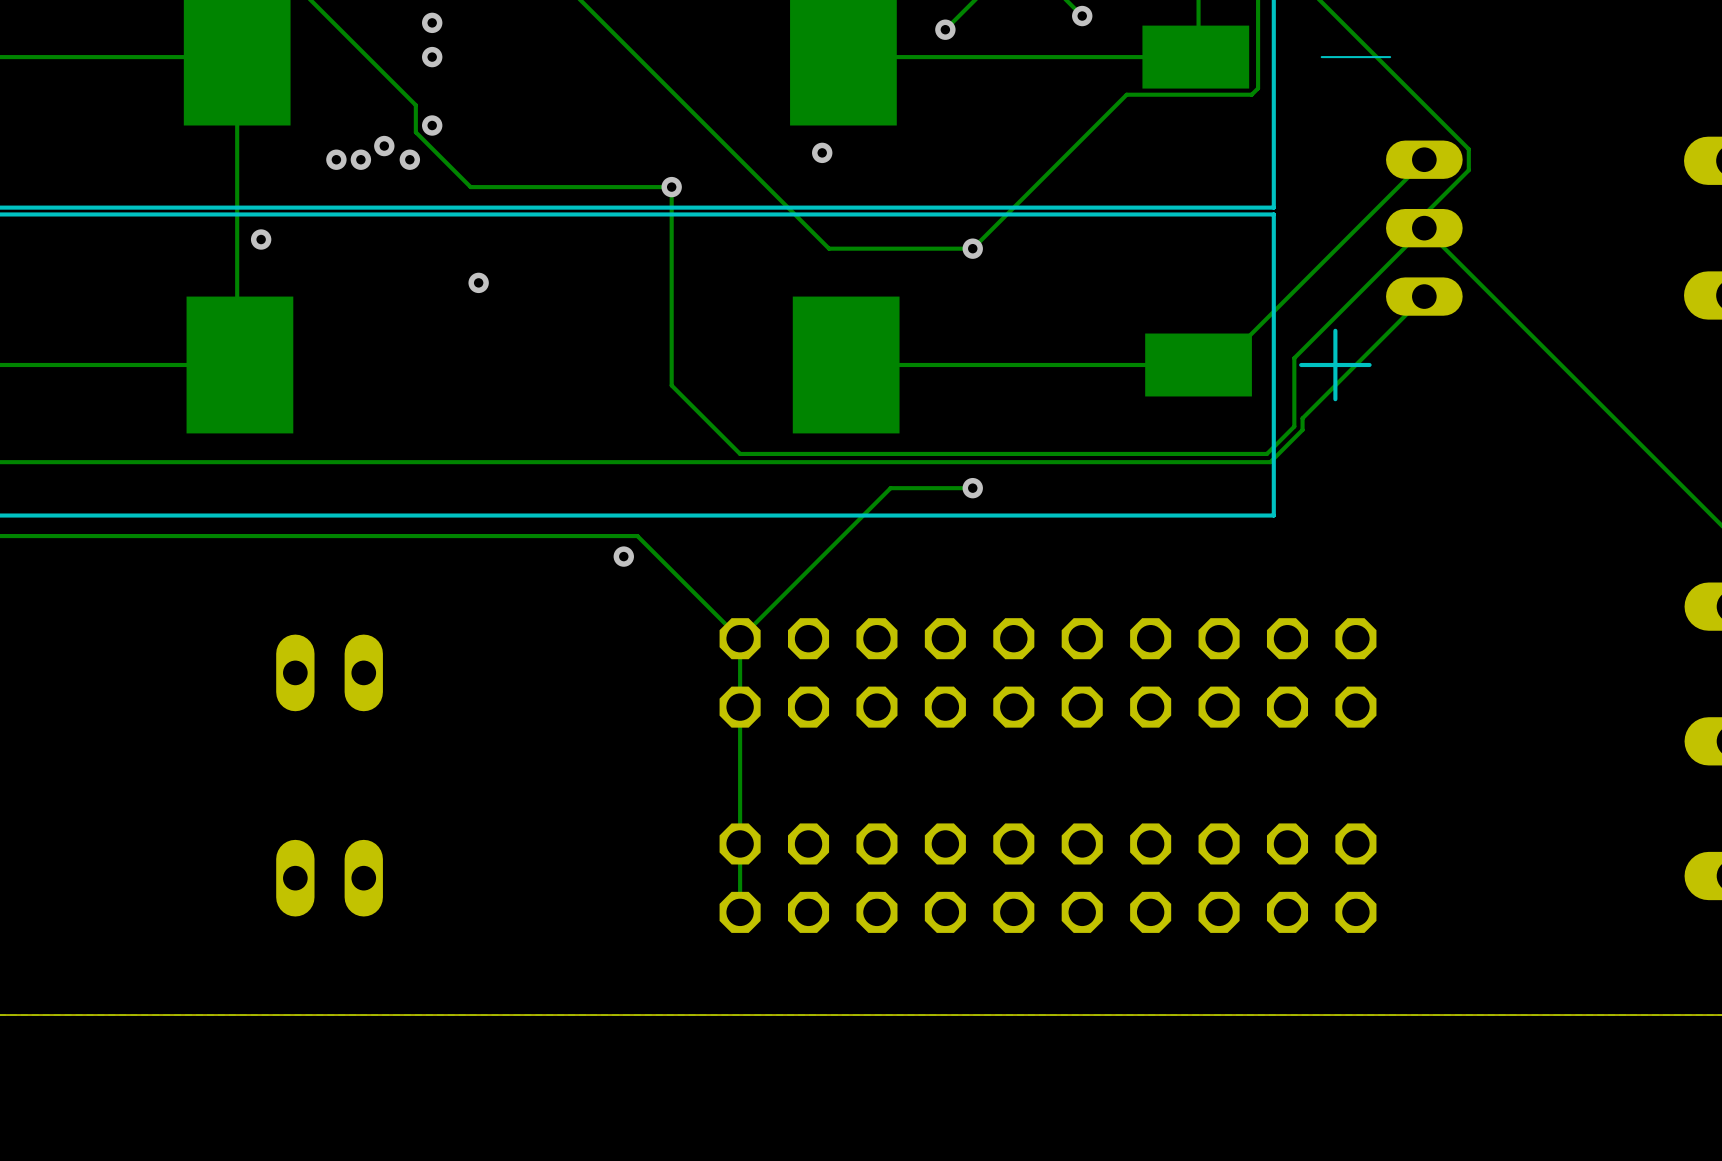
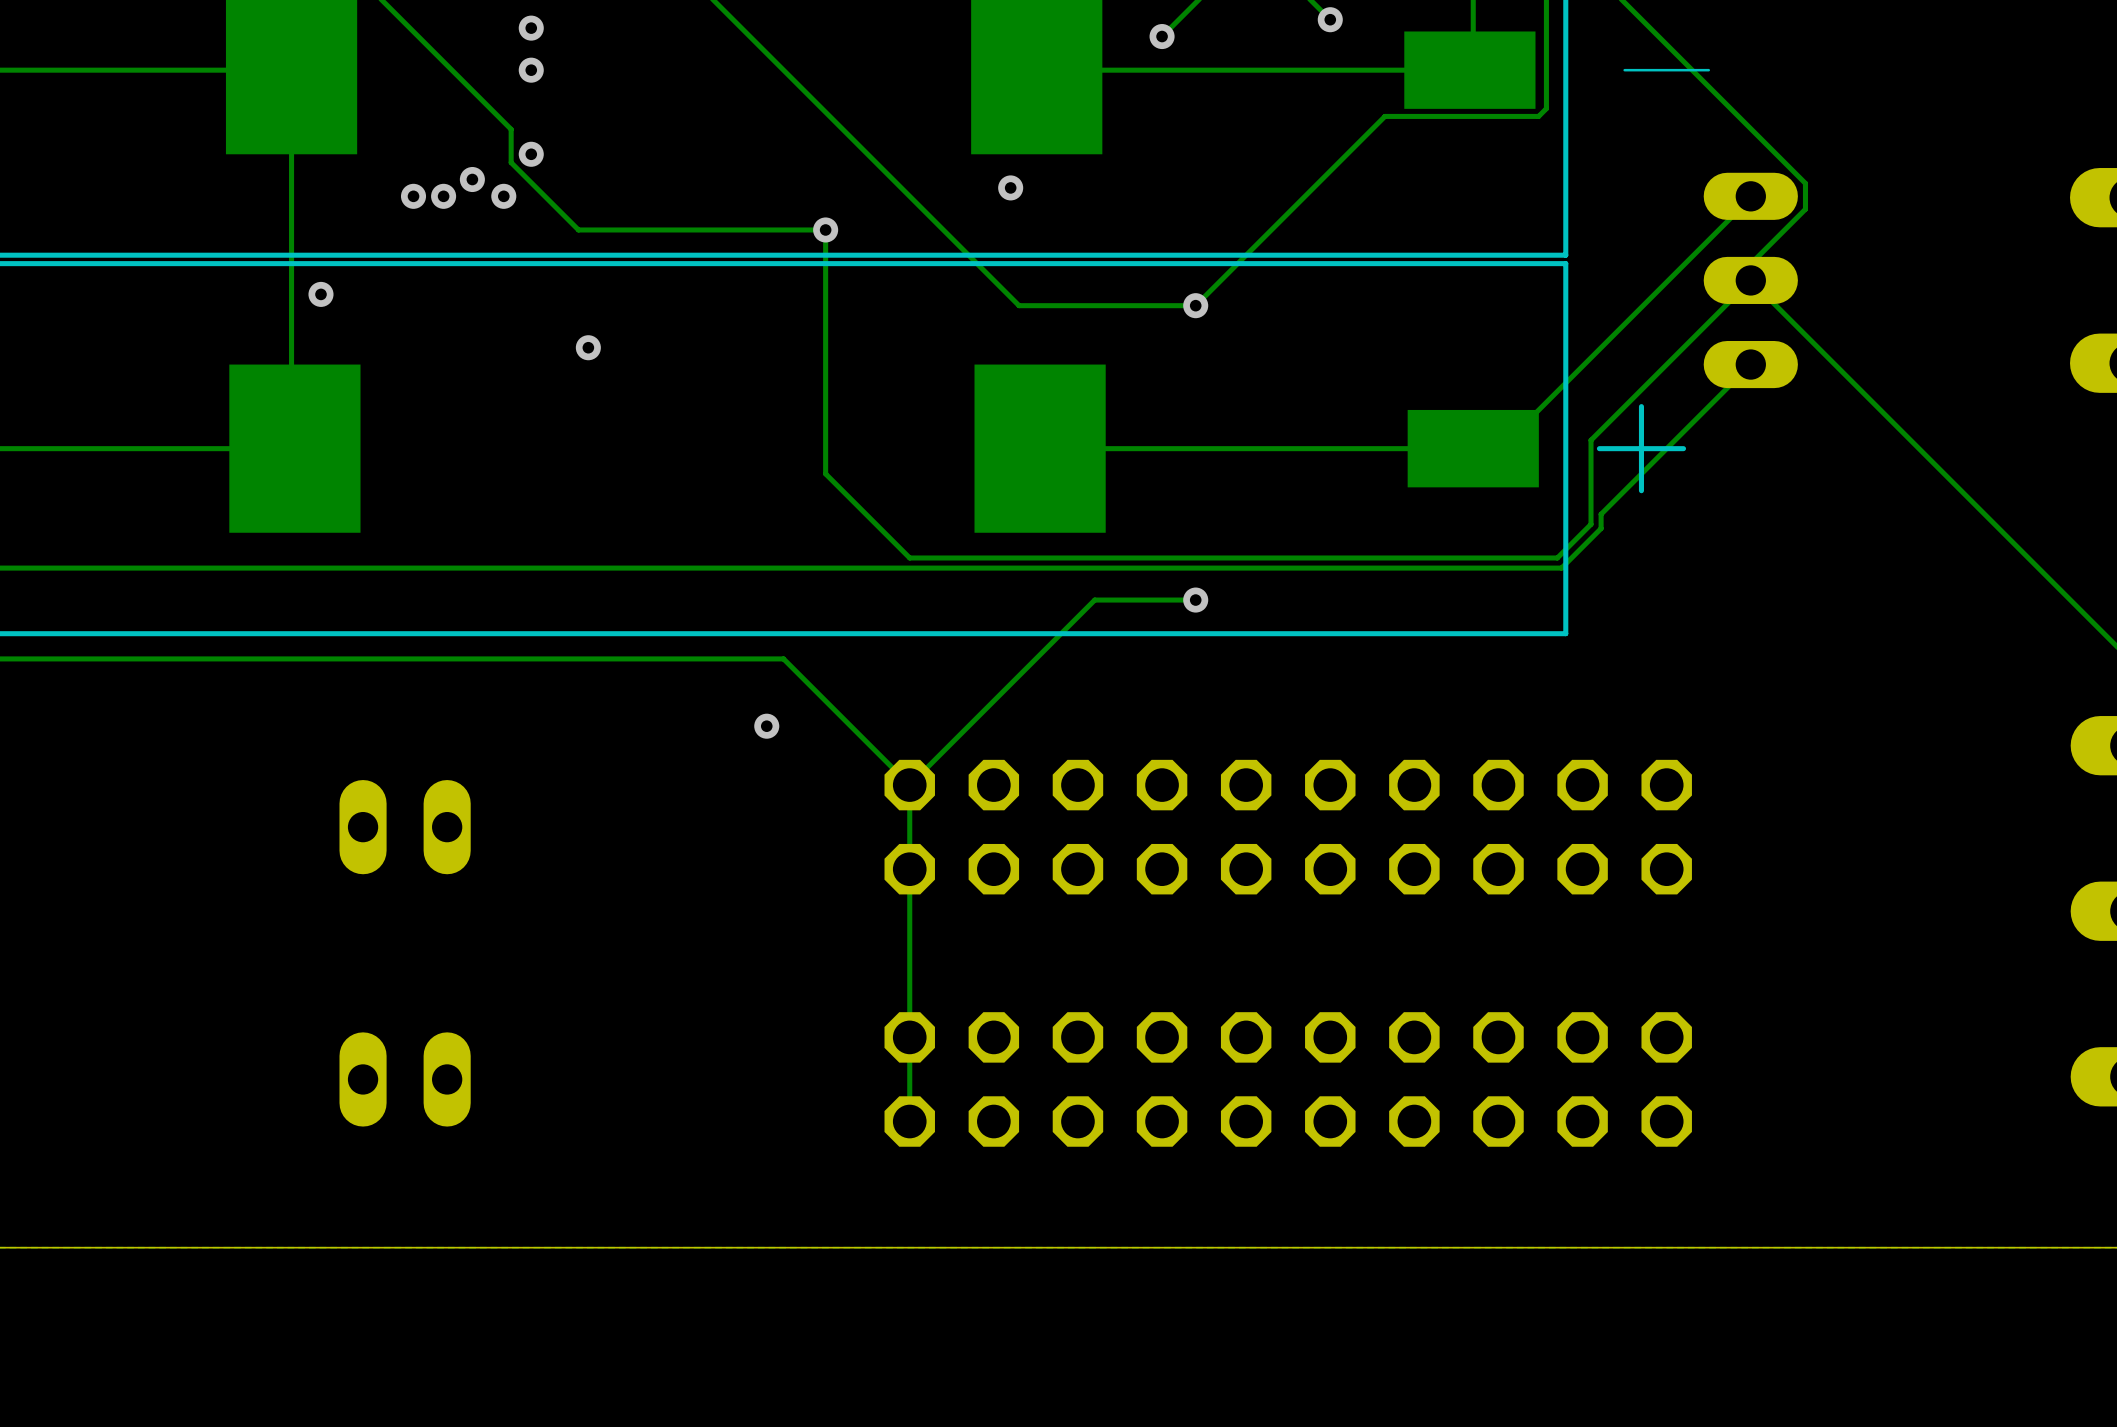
via position: (623, 556) -> (766, 726)

